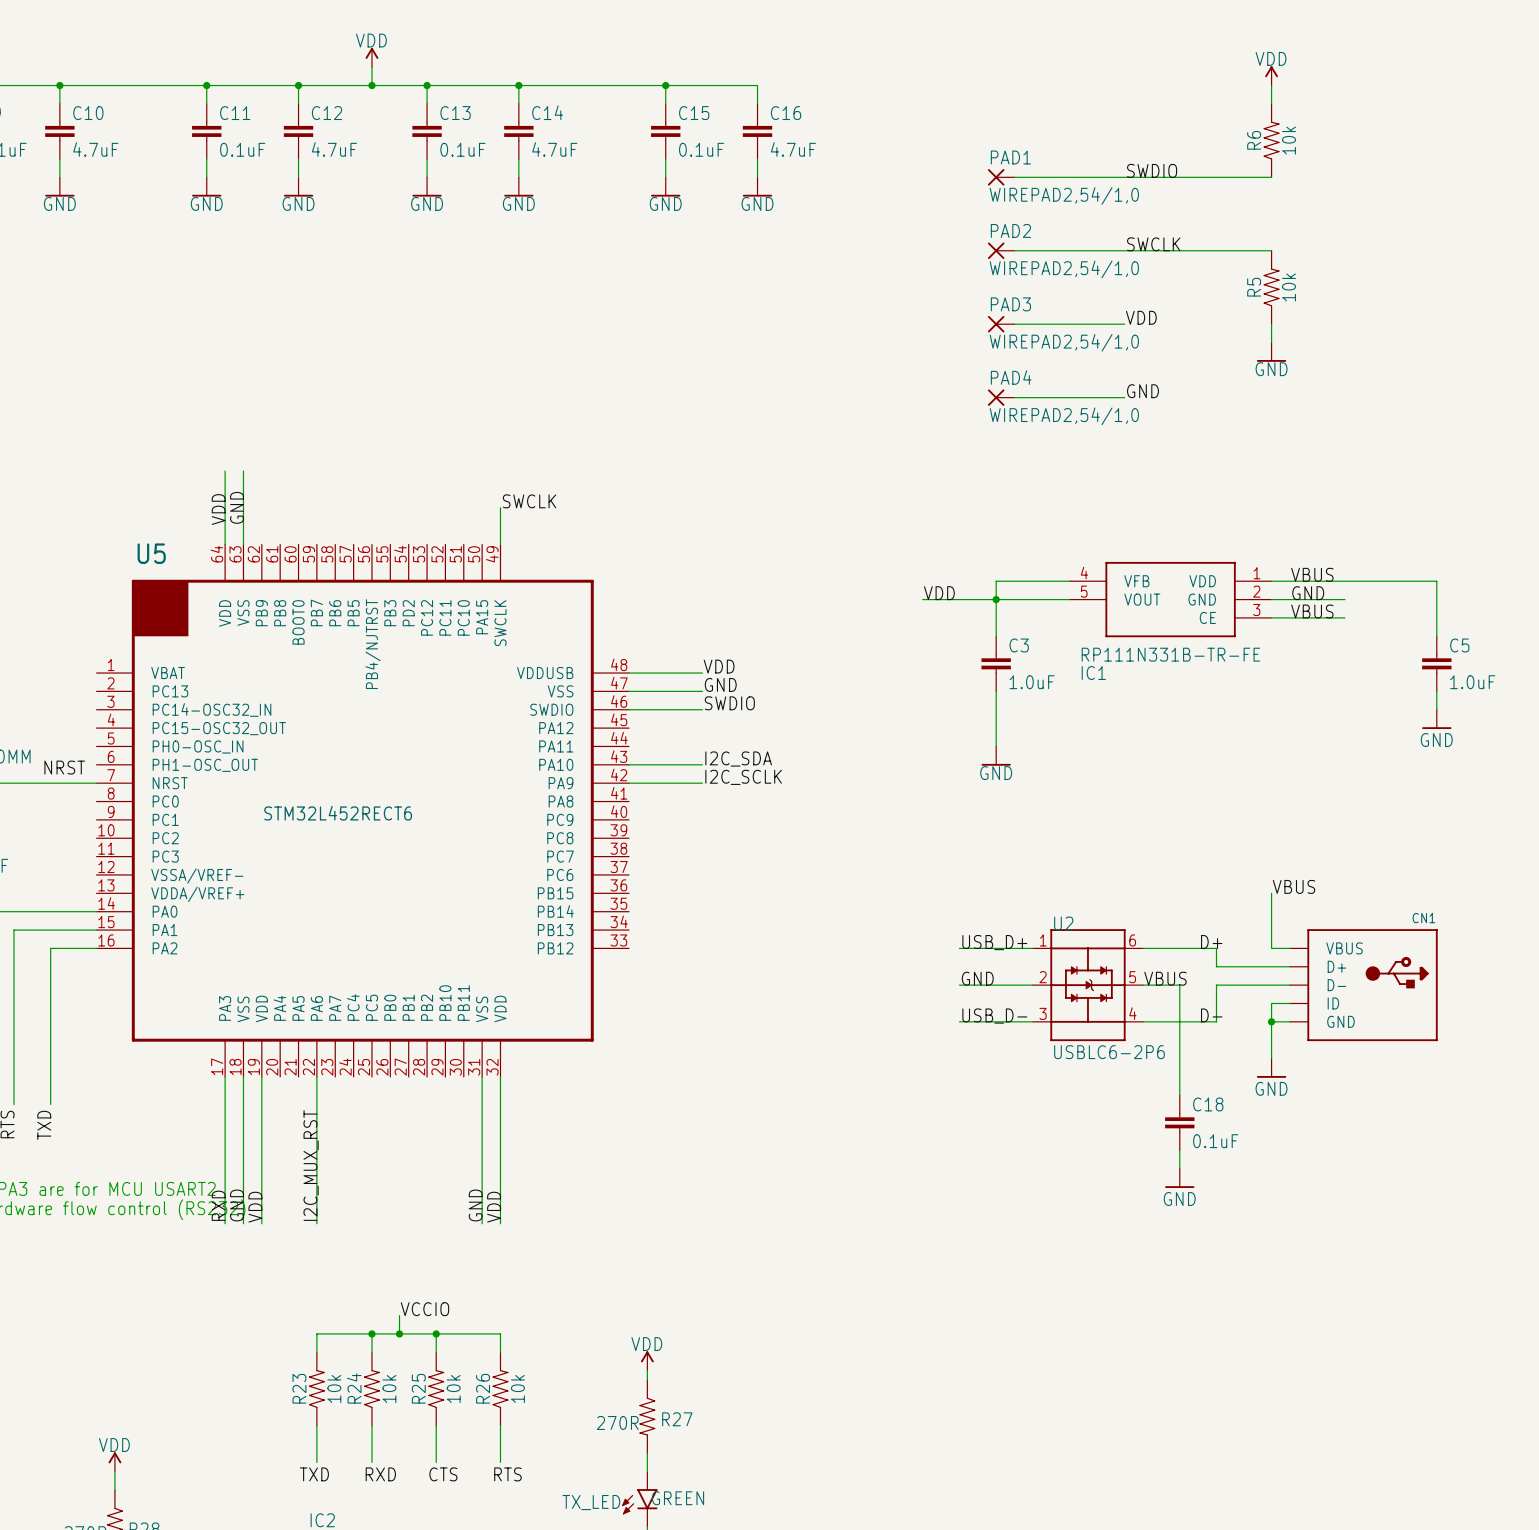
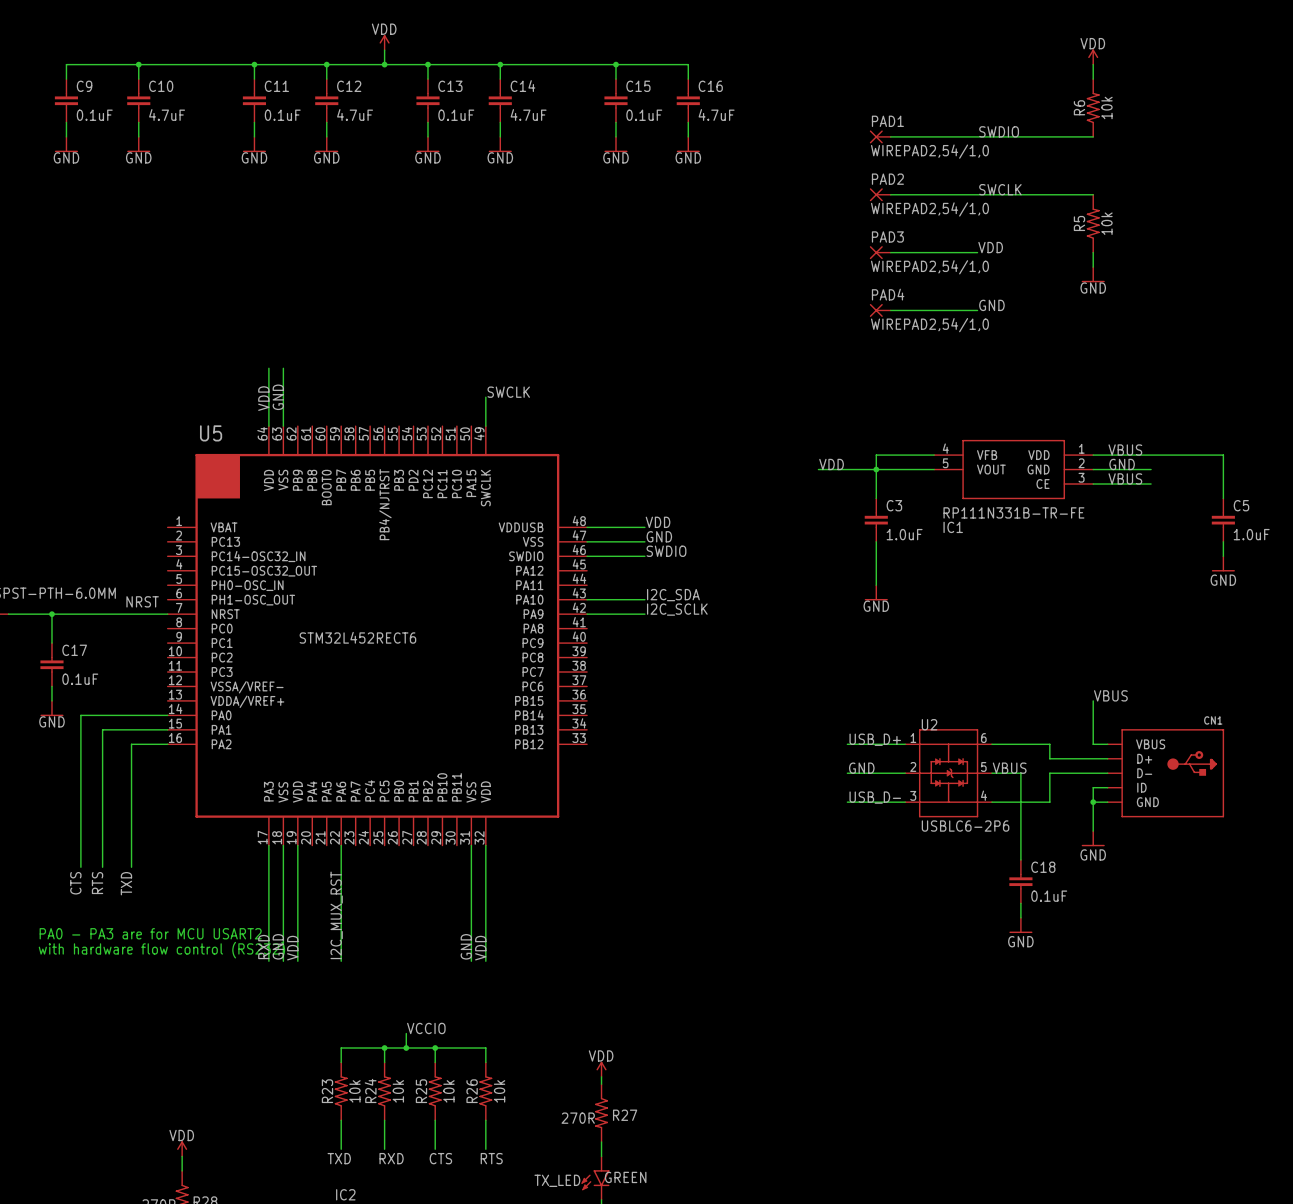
label: D+ (1211, 941) -> none
label: D- (1211, 1015) -> none

